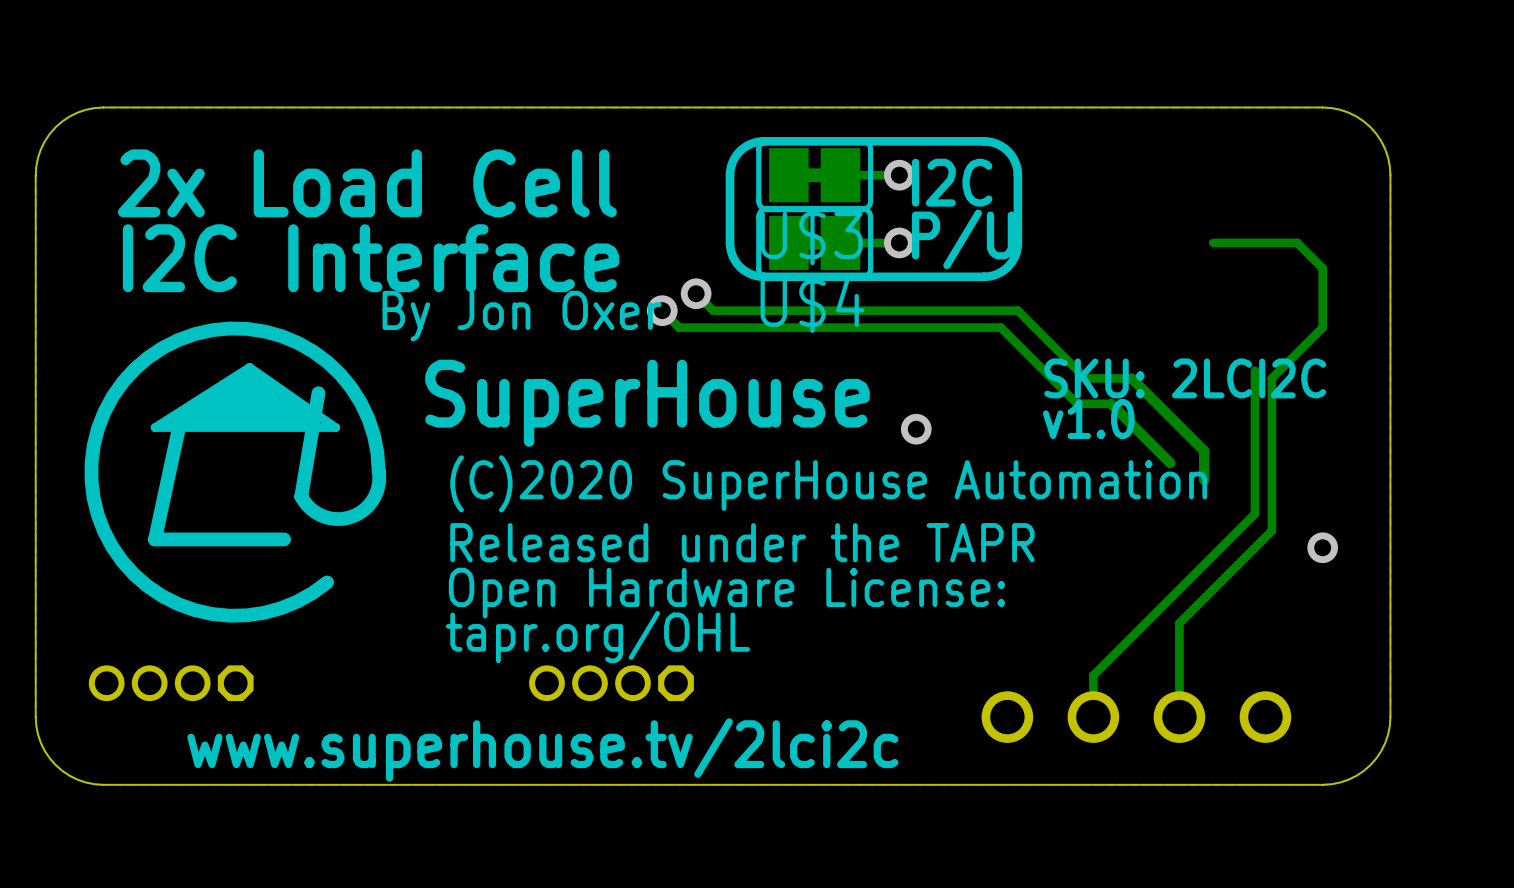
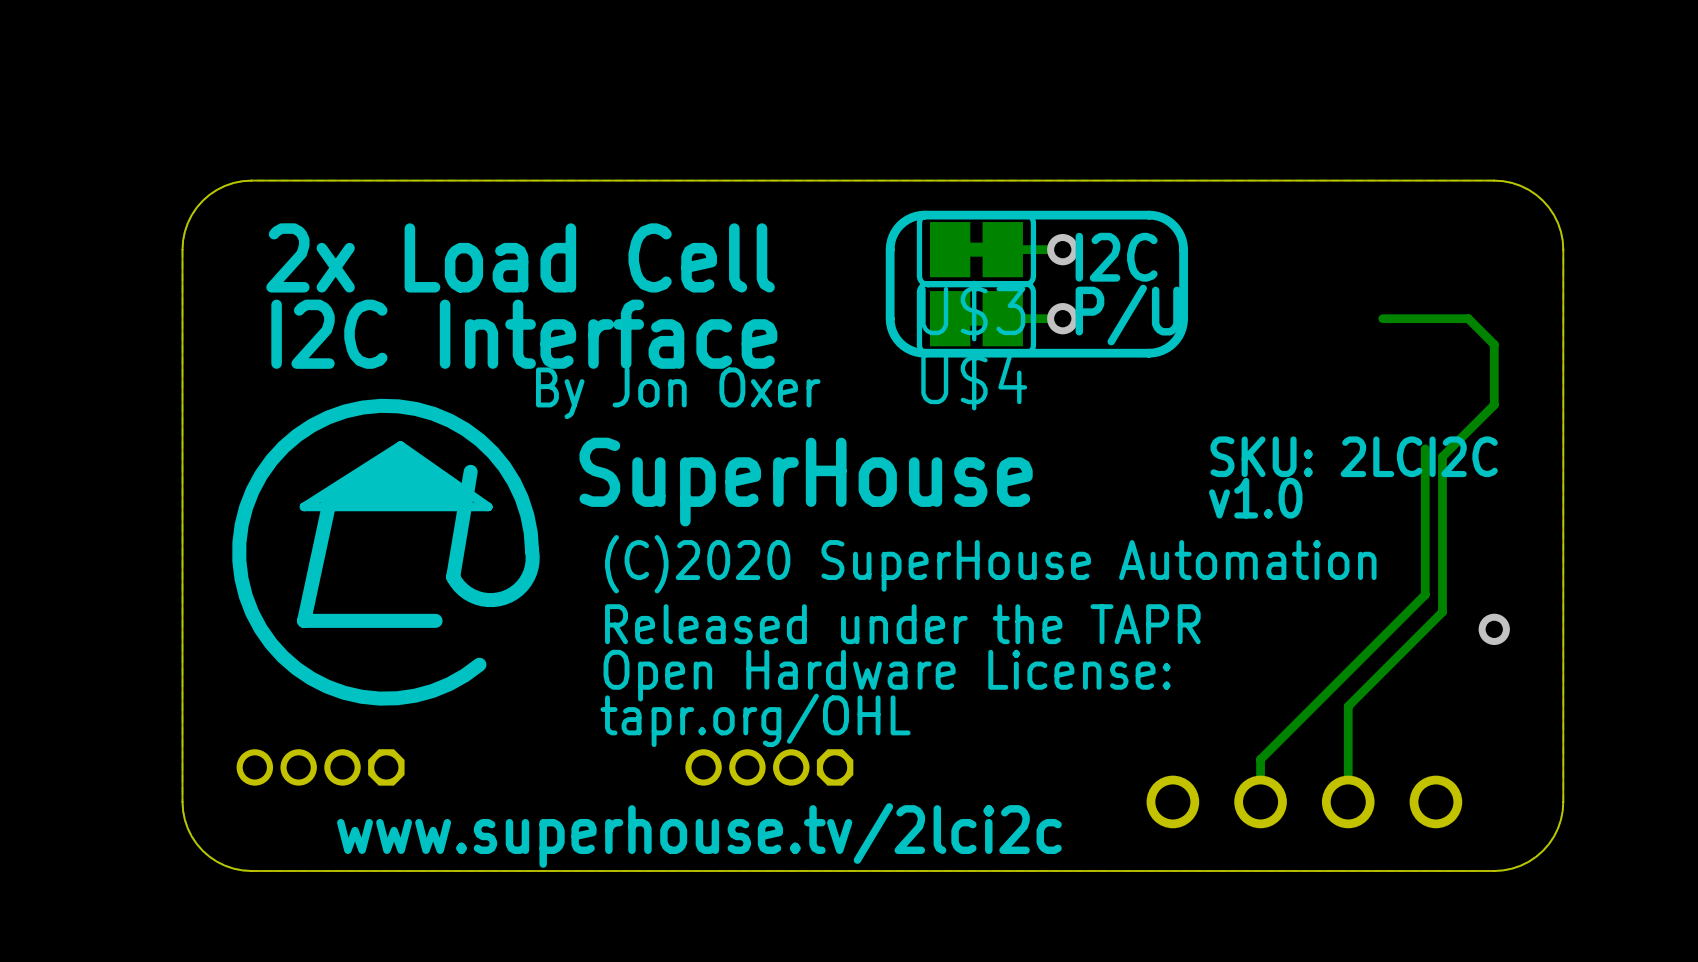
track: (696, 293) (713, 310) (1017, 310) (1085, 378) (1131, 378) (1204, 450) (1204, 480) -> none
via: (696, 293) -> none
track: (662, 310) (679, 327) (1000, 327) (1077, 403) (1111, 403) (1170, 463) -> none
via: (662, 310) -> none
via: (916, 429) -> none

